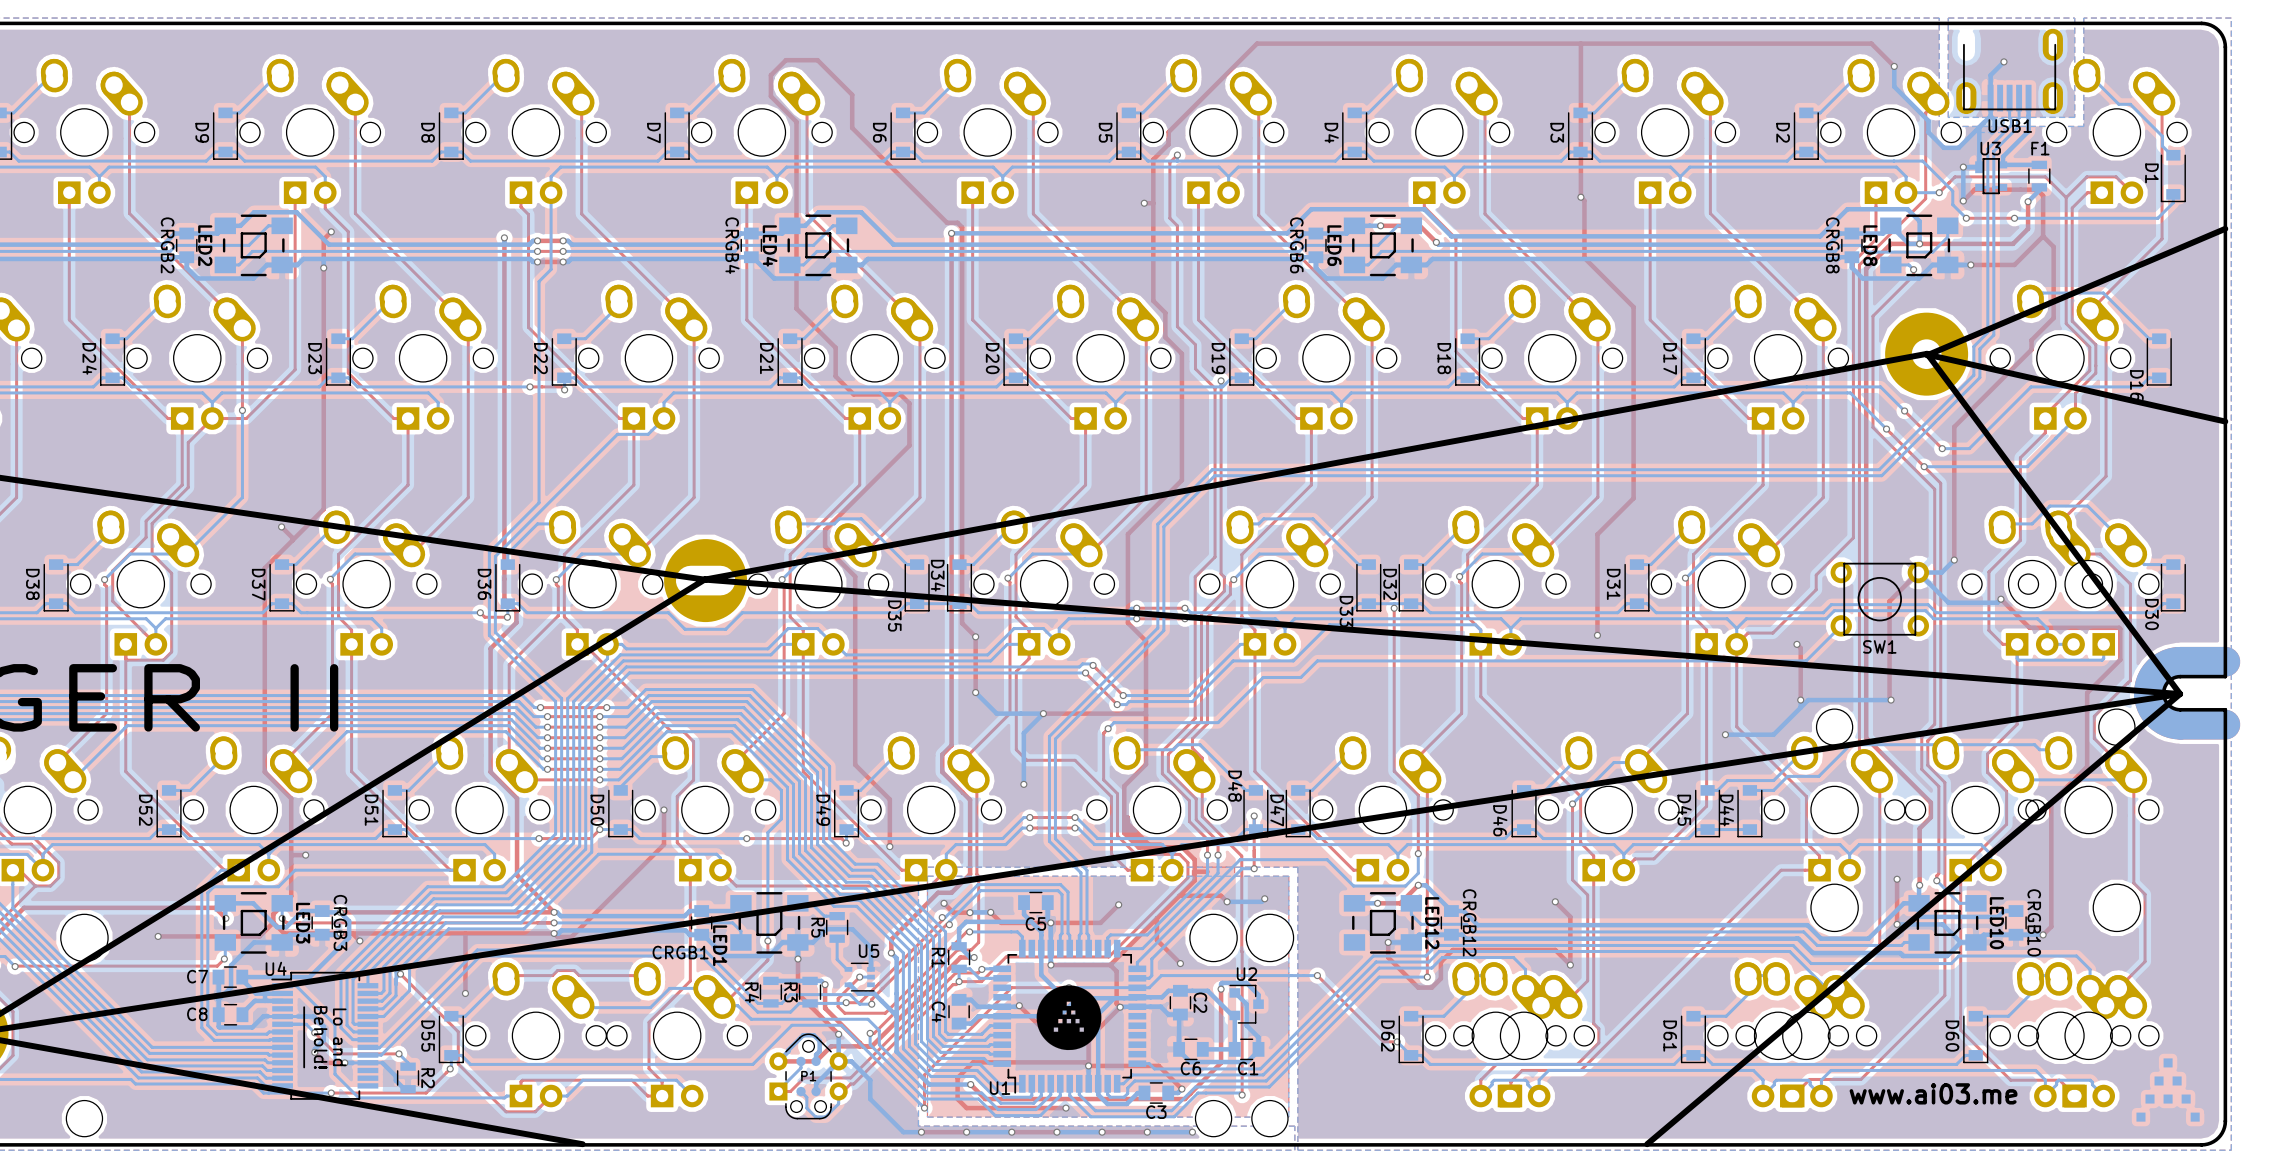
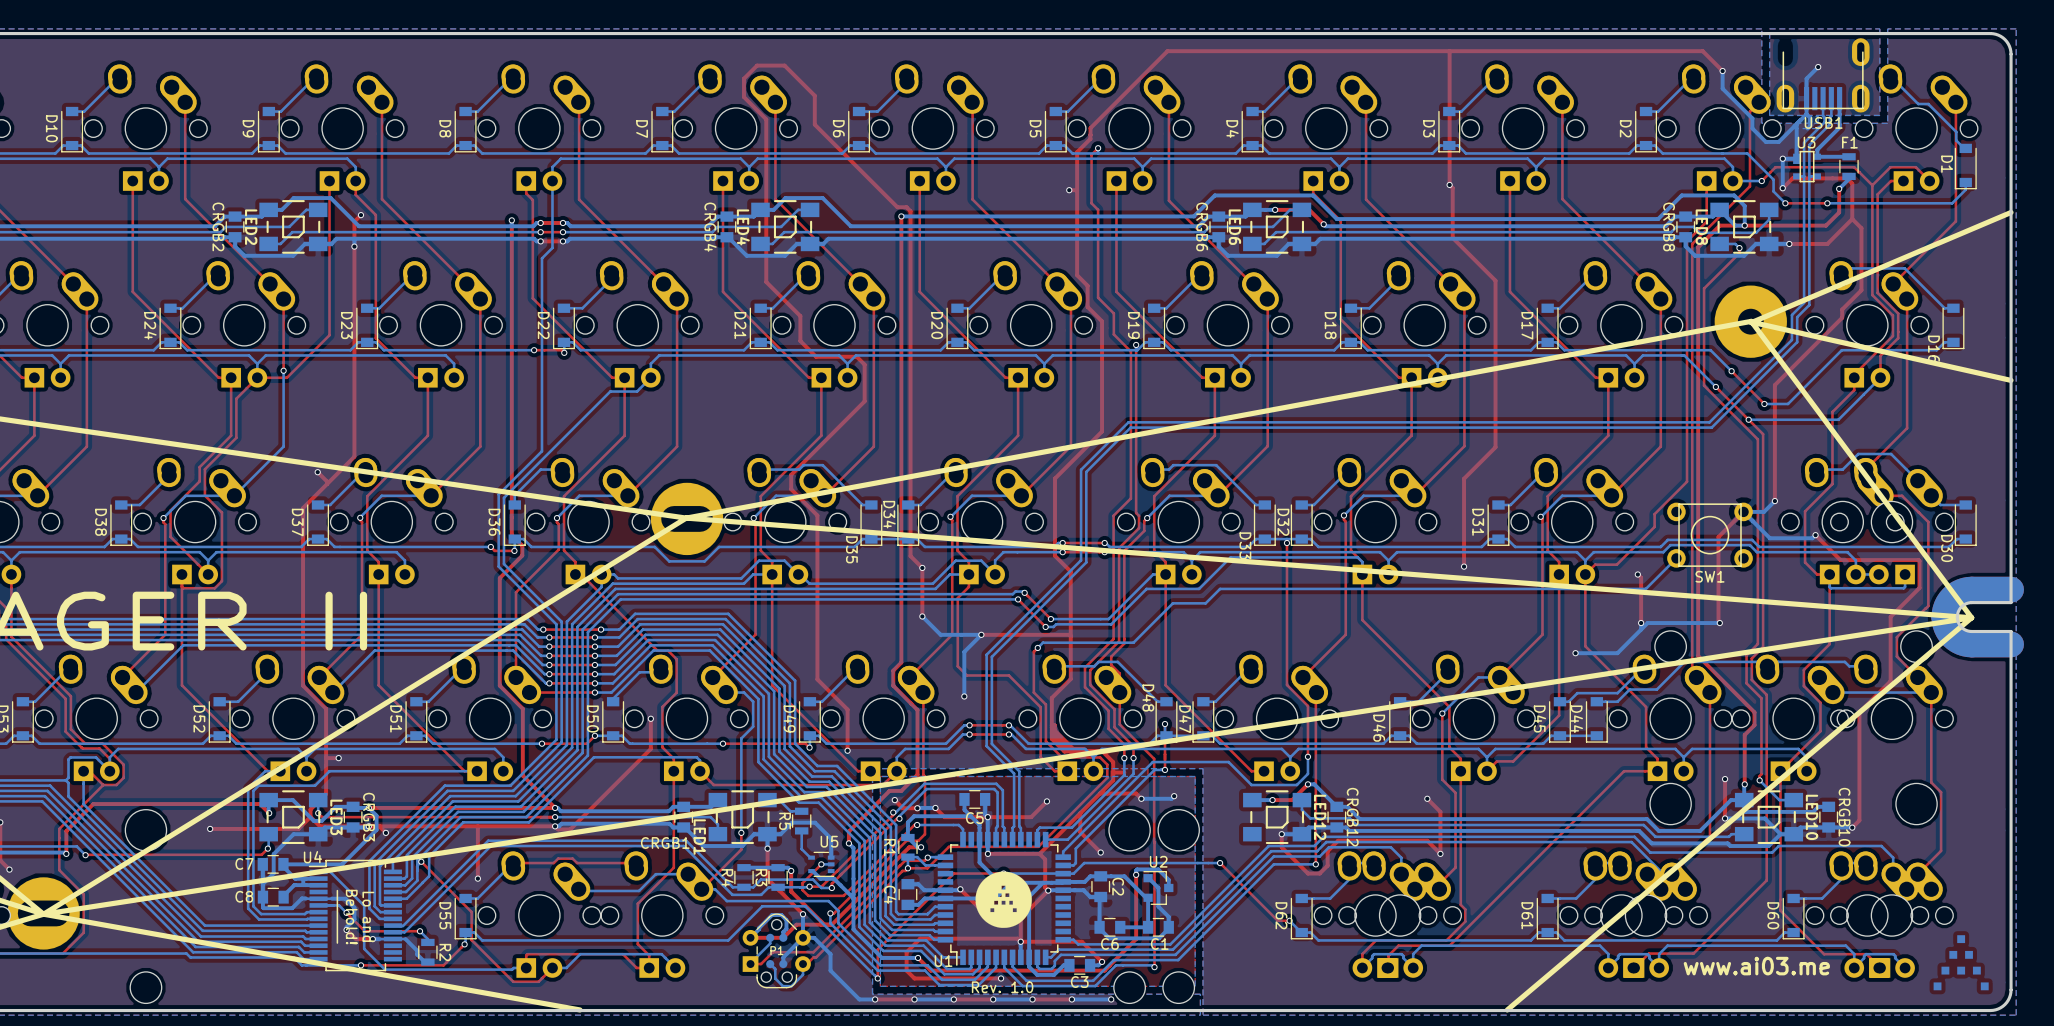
text: none -> Rev. 1.0 (1002, 987)

